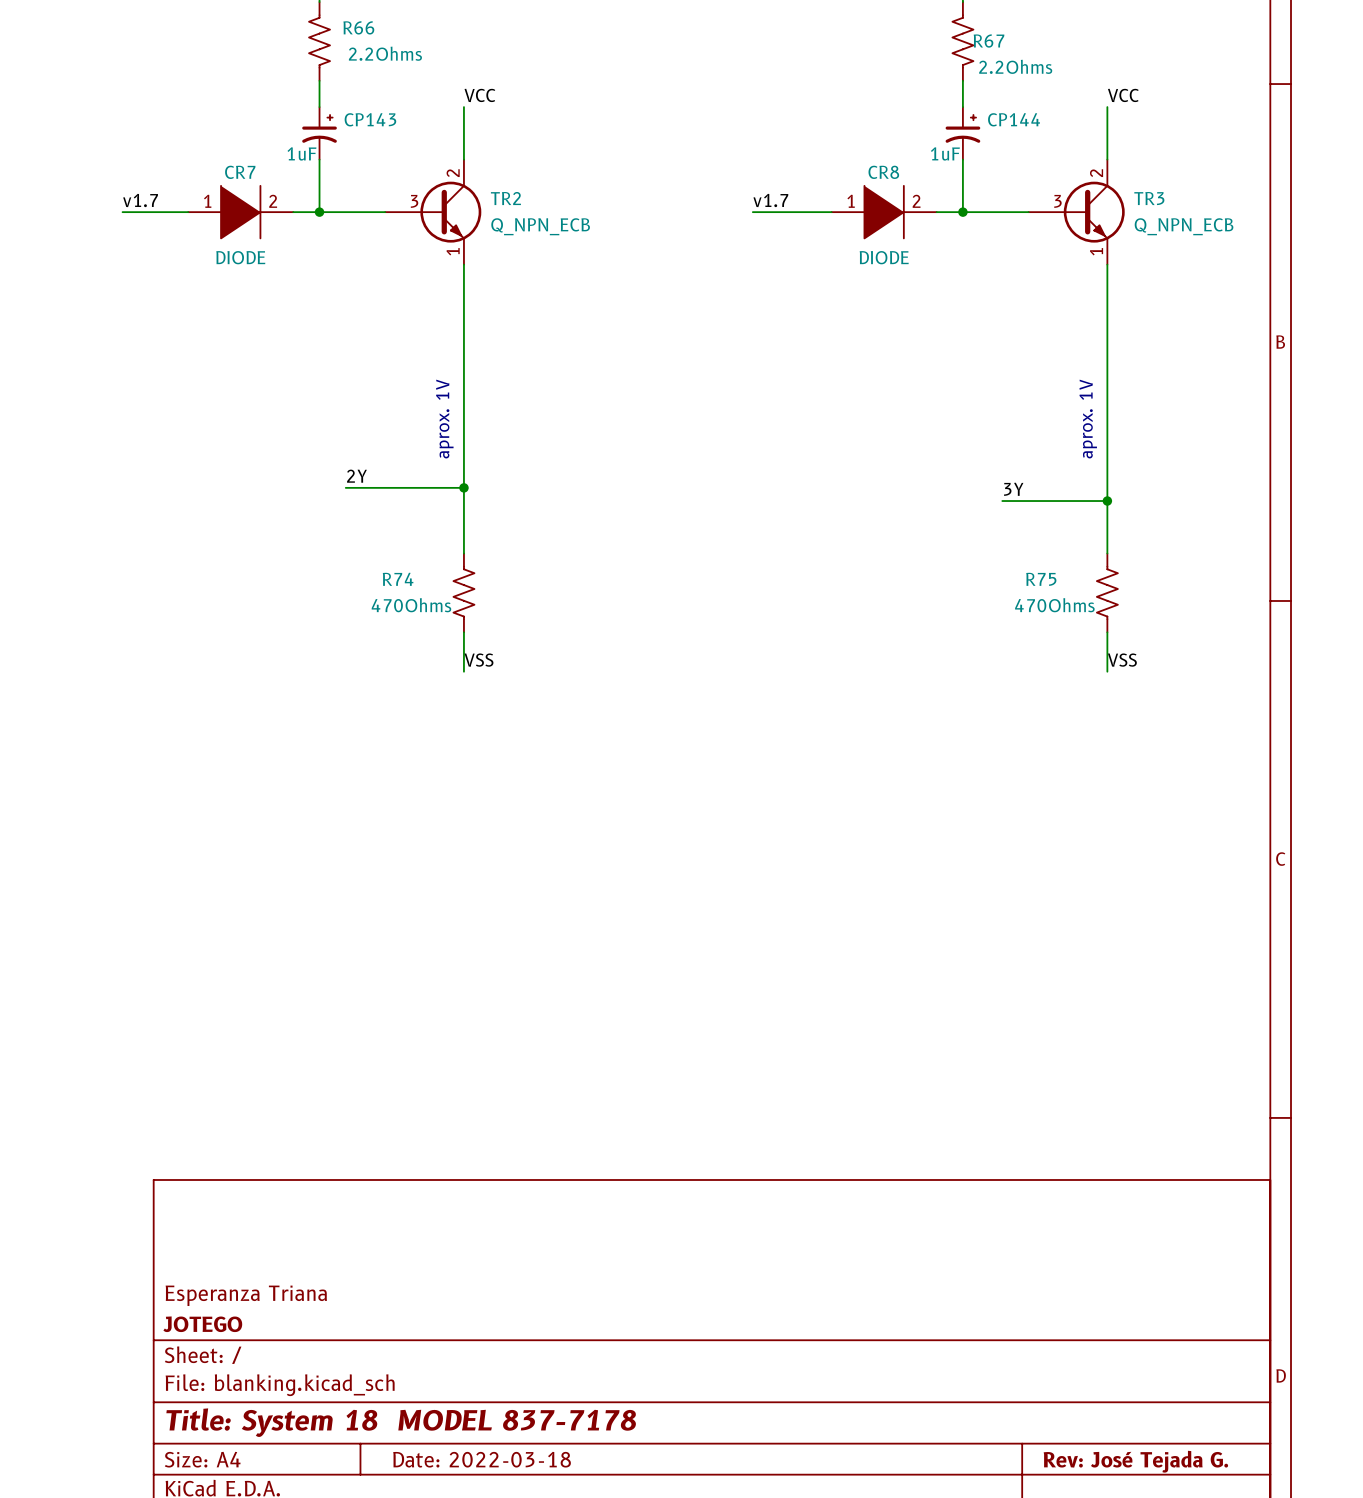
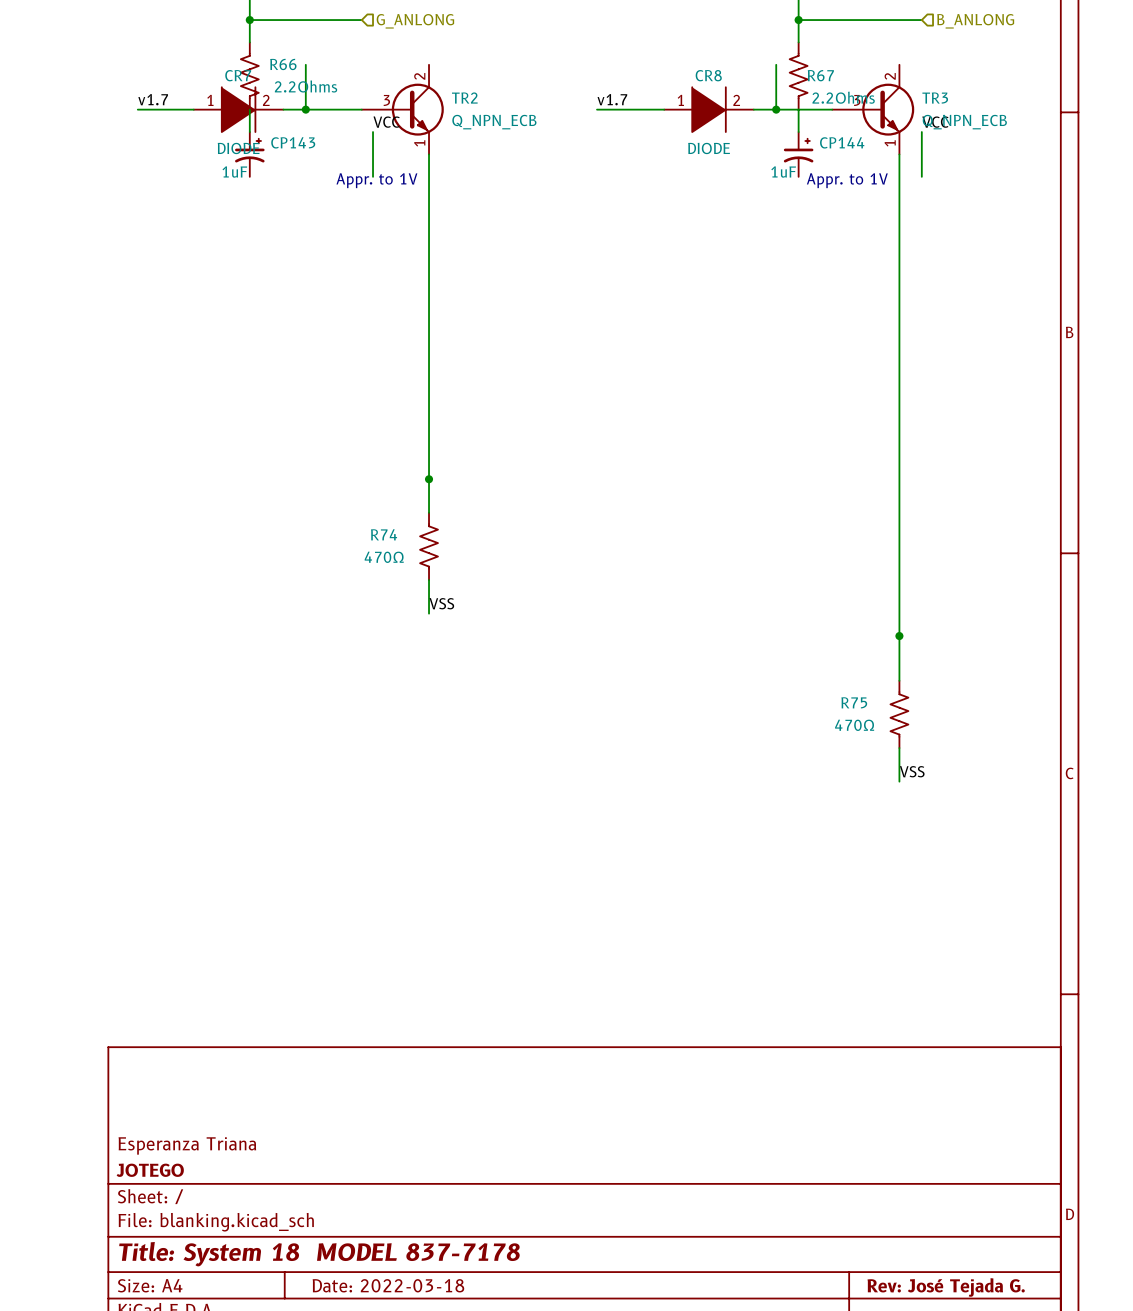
junction: none -> (305, 109)
junction: none -> (776, 109)
wire: none -> (429, 154) (429, 512)
wire: none -> (899, 154) (899, 680)
wire: (319, 159) (319, 212) -> (305, 64) (305, 109)
wire: (962, 159) (962, 212) -> (776, 64) (776, 109)
text: none -> Appr. to 1V (376, 180)
text: none -> Appr. to 1V (847, 180)
label position: v1.7 (140, 200) -> v1.7 (153, 99)
label position: v1.7 (770, 200) -> v1.7 (612, 99)
wire: (122, 212) (188, 212) -> (137, 109) (193, 109)
CR7 position: (240, 212) -> (238, 109)
wire: (293, 212) (385, 212) -> (283, 109) (361, 109)
junction: (319, 212) -> none
TR2 position: (433, 212) -> (402, 109)
wire: (752, 212) (831, 212) -> (597, 109) (664, 109)
CR8 position: (884, 212) -> (709, 109)
wire: (936, 212) (1028, 212) -> (753, 109) (832, 109)
junction: (962, 212) -> none
TR3 position: (1076, 212) -> (873, 109)
wire: (463, 264) (463, 553) -> none
wire: (1107, 264) (1107, 553) -> none
text: aprox. 1V (444, 419) -> none
text: aprox. 1V (1088, 419) -> none
label: 2Y (356, 476) -> none
wire: (345, 487) (463, 487) -> none
junction: (463, 487) -> none
label: 3Y (1013, 489) -> none
wire: (1002, 501) (1107, 501) -> none
junction: (1107, 501) -> none
junction: none -> (429, 479)
R74 name position: R74 (398, 579) -> R74 (384, 534)
R75 name position: R75 (1041, 579) -> R75 (854, 702)
R74 position: (463, 592) -> (429, 546)
R75 position: (1107, 592) -> (899, 714)
R74 value: 470Ohms (411, 605) -> 470Ω (384, 557)
R75 value: 470Ohms (1054, 605) -> 470Ω (854, 725)
wire: (463, 632) (463, 671) -> (429, 580) (429, 613)
wire: (1107, 632) (1107, 671) -> (899, 748) (899, 781)
label position: VSS (478, 660) -> VSS (441, 603)
label position: VSS (1122, 660) -> VSS (912, 771)
junction: none -> (899, 636)

